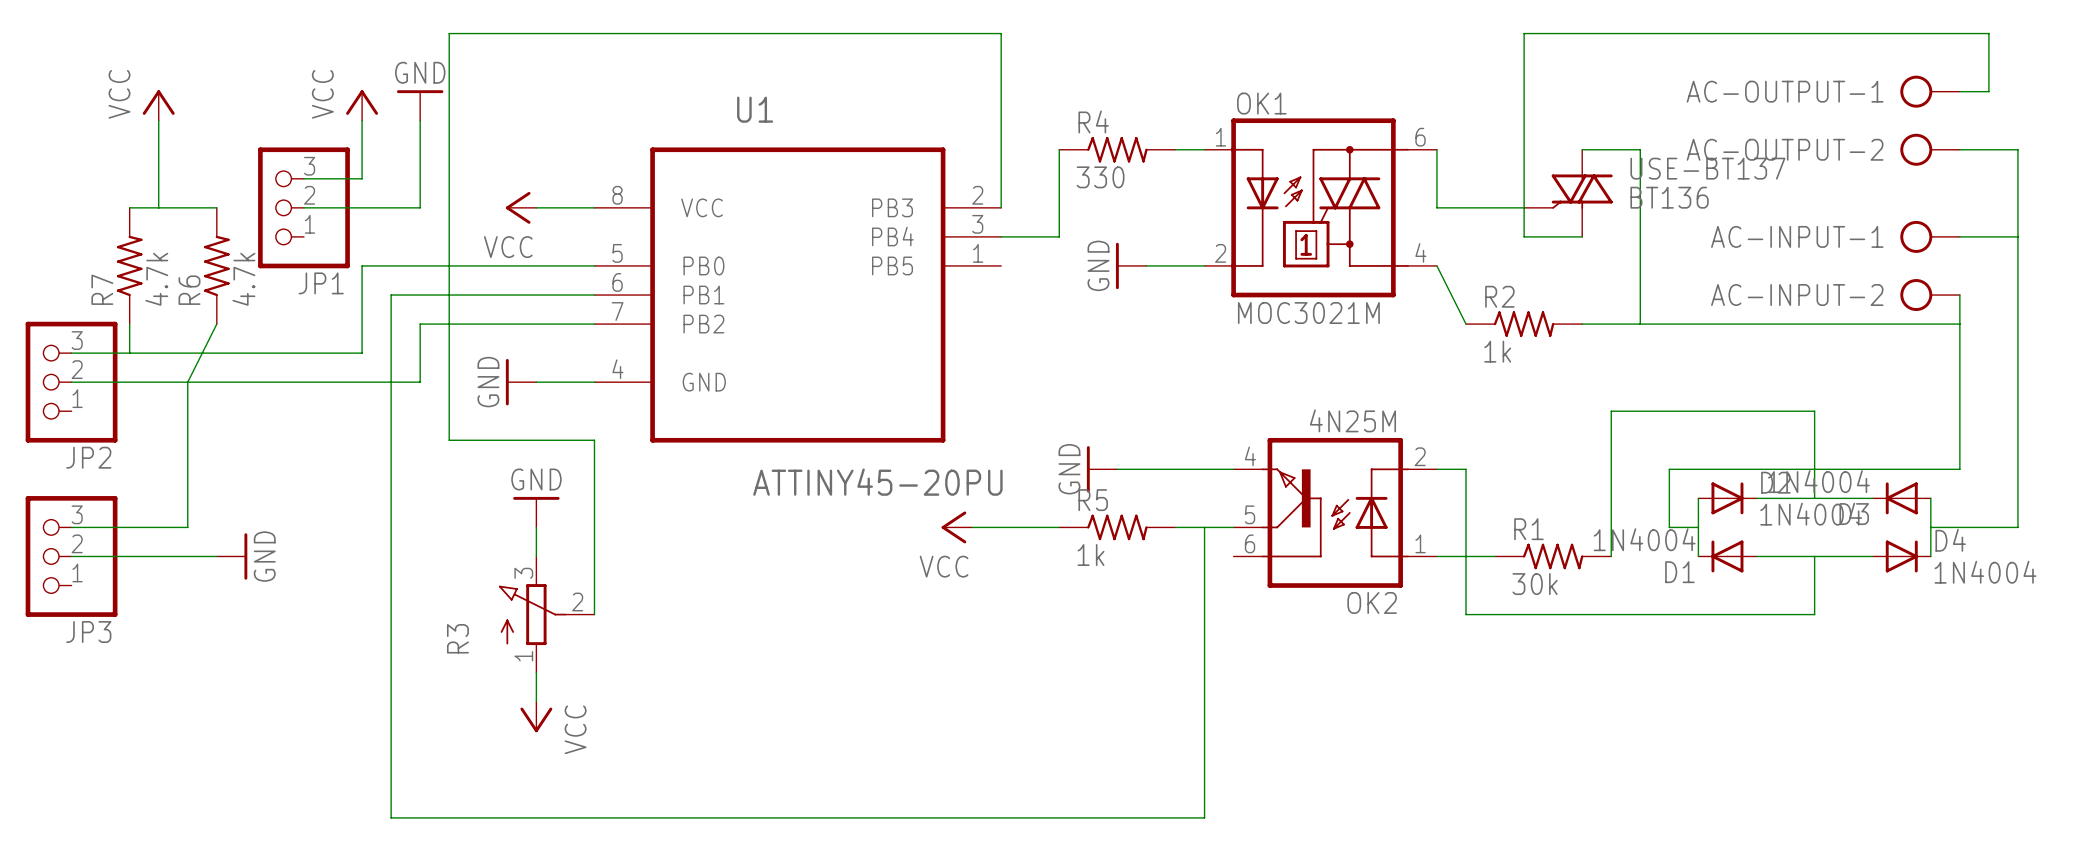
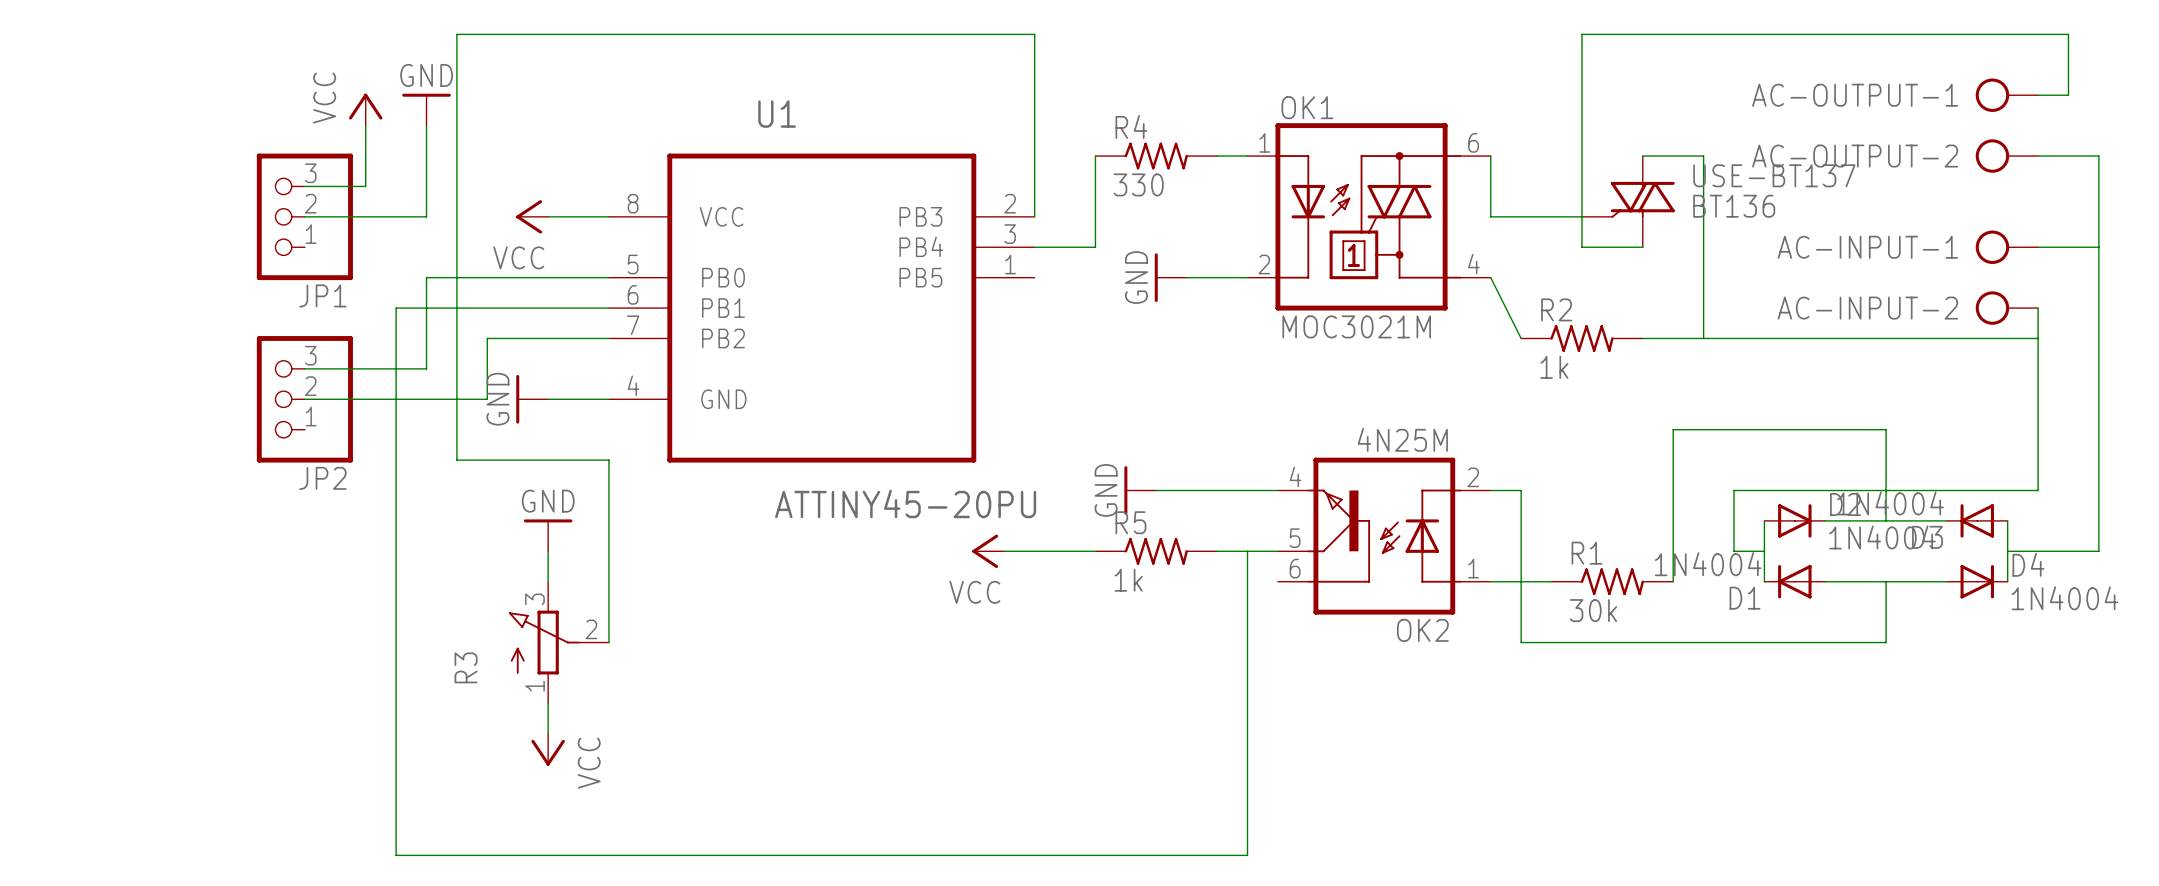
power symbol: VCC (158, 105) -> none
wire: (158, 120) (158, 207) -> none
wire: (129, 207) (216, 207) -> none
R7: 4.7k (129, 265) -> none
R6: 4.7k (216, 265) -> none
wire: (420, 265) (362, 265) (362, 353) -> (426, 277) (426, 338)
wire: (129, 324) (129, 353) -> none
wire: (216, 324) (187, 382) (187, 527) (71, 527) -> none
wire: (420, 324) (478, 324) -> (426, 399) (487, 399) (487, 338)
wire: (71, 353) (303, 353) -> none
wire: (420, 353) (420, 382) -> (426, 368) (365, 368)
wire: (71, 382) (303, 382) -> none
JP2 position: (71, 382) -> (304, 399)
wire: (71, 556) (216, 556) -> none
JP3: (71, 556) -> none
power symbol: GND (232, 556) -> none

